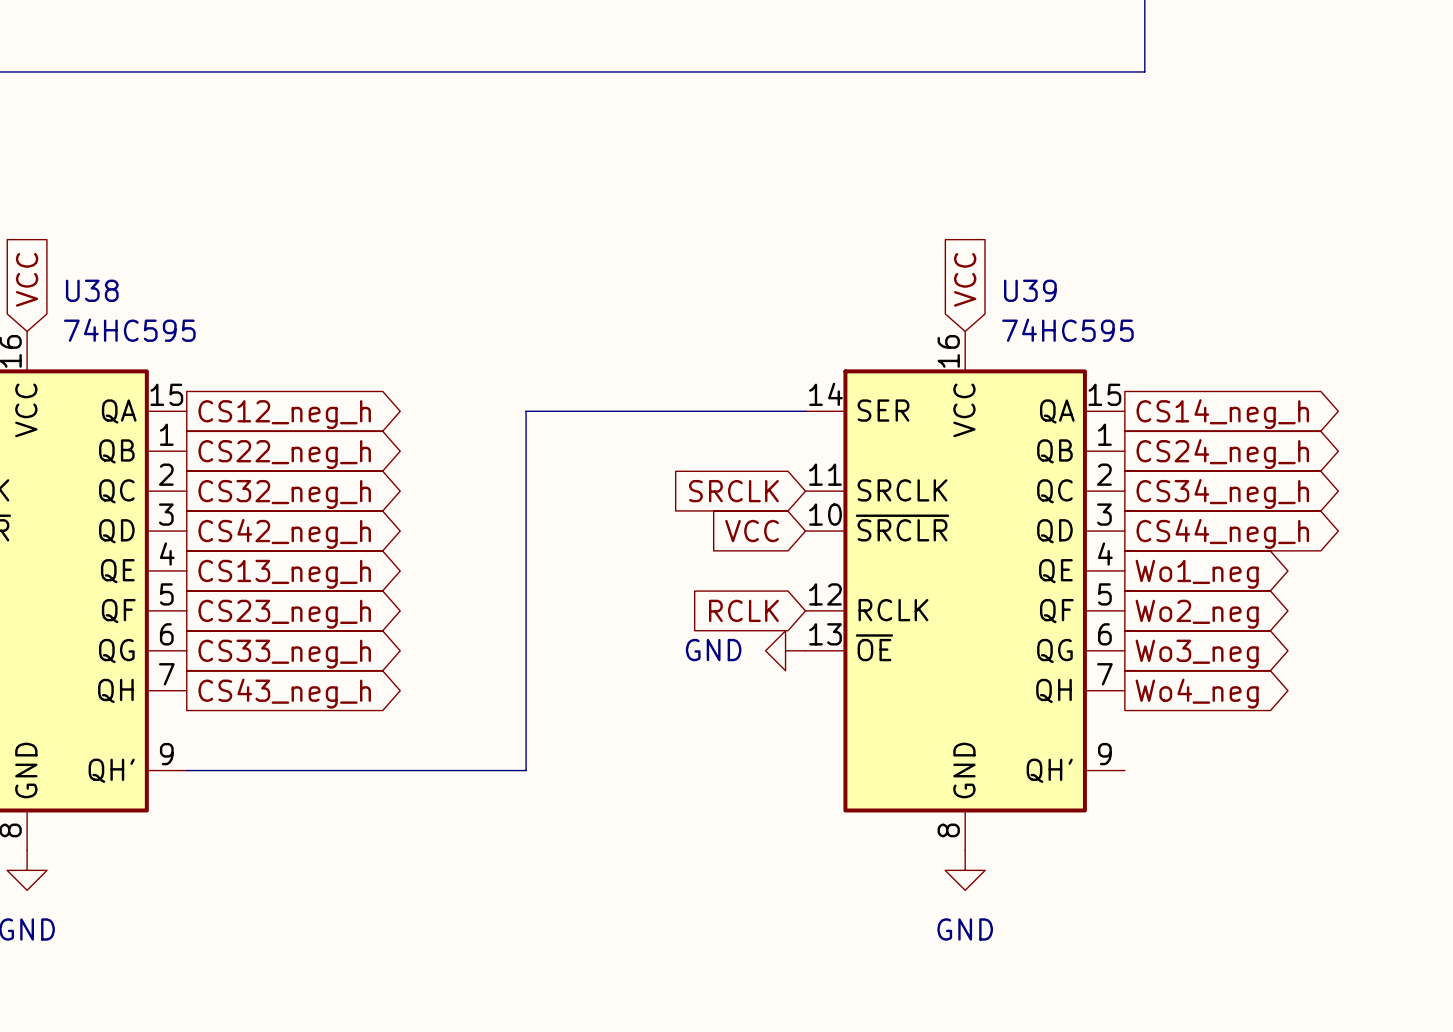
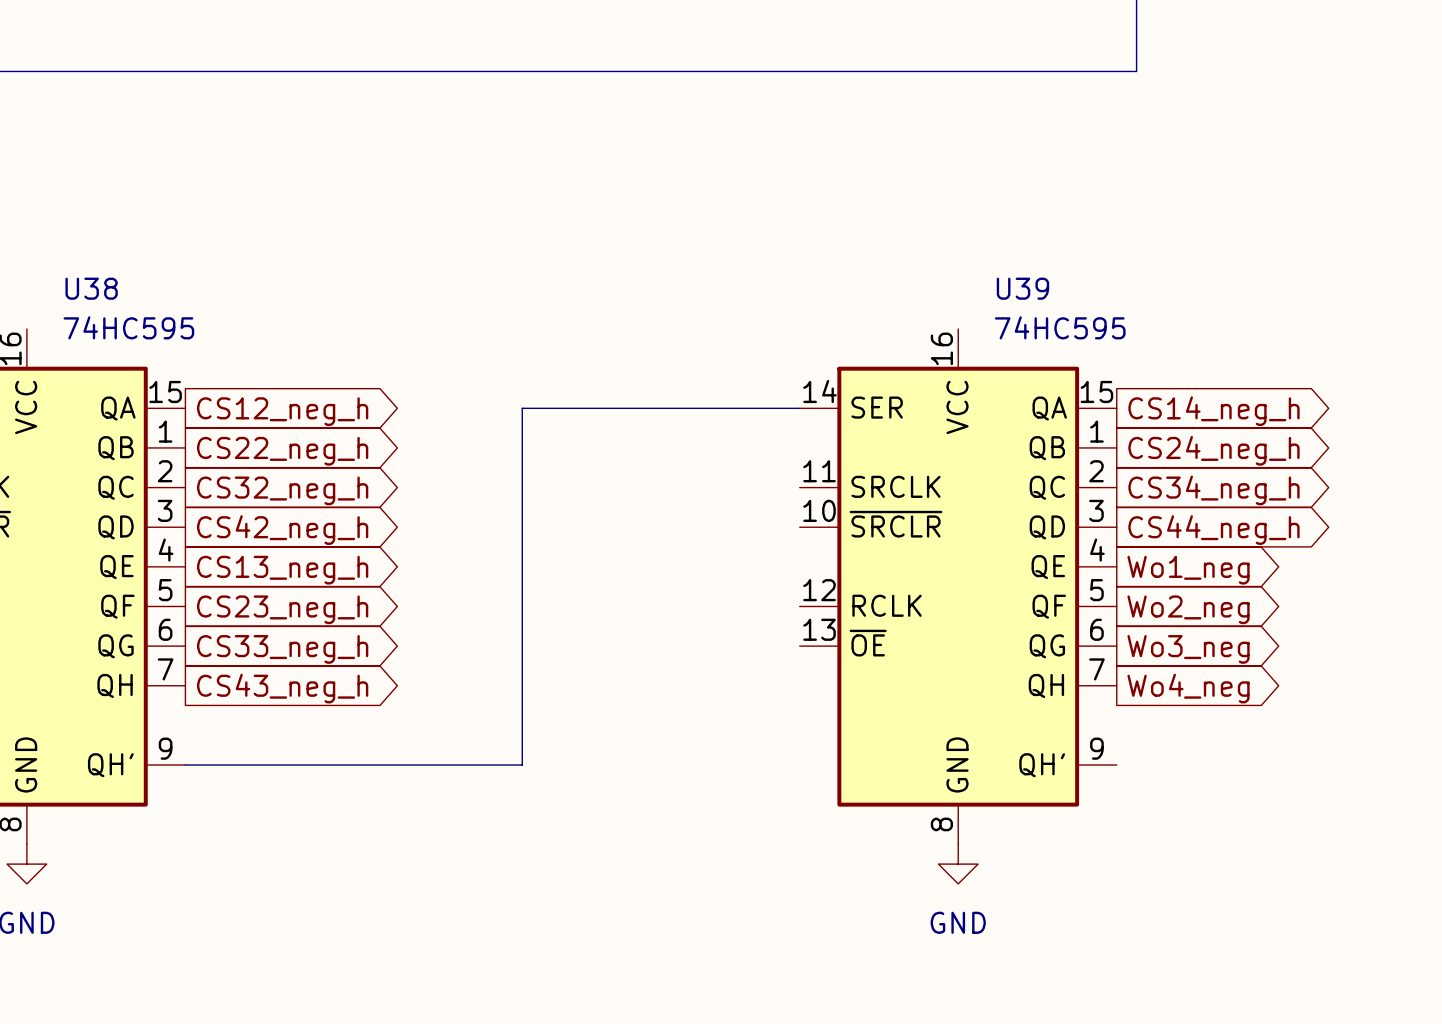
global label: VCC (27, 279) -> none
global label: VCC (965, 279) -> none
global label: SRCLK (733, 491) -> none
global label: VCC (752, 531) -> none
global label: RCLK (743, 610) -> none
power symbol: GND (785, 650) -> none

